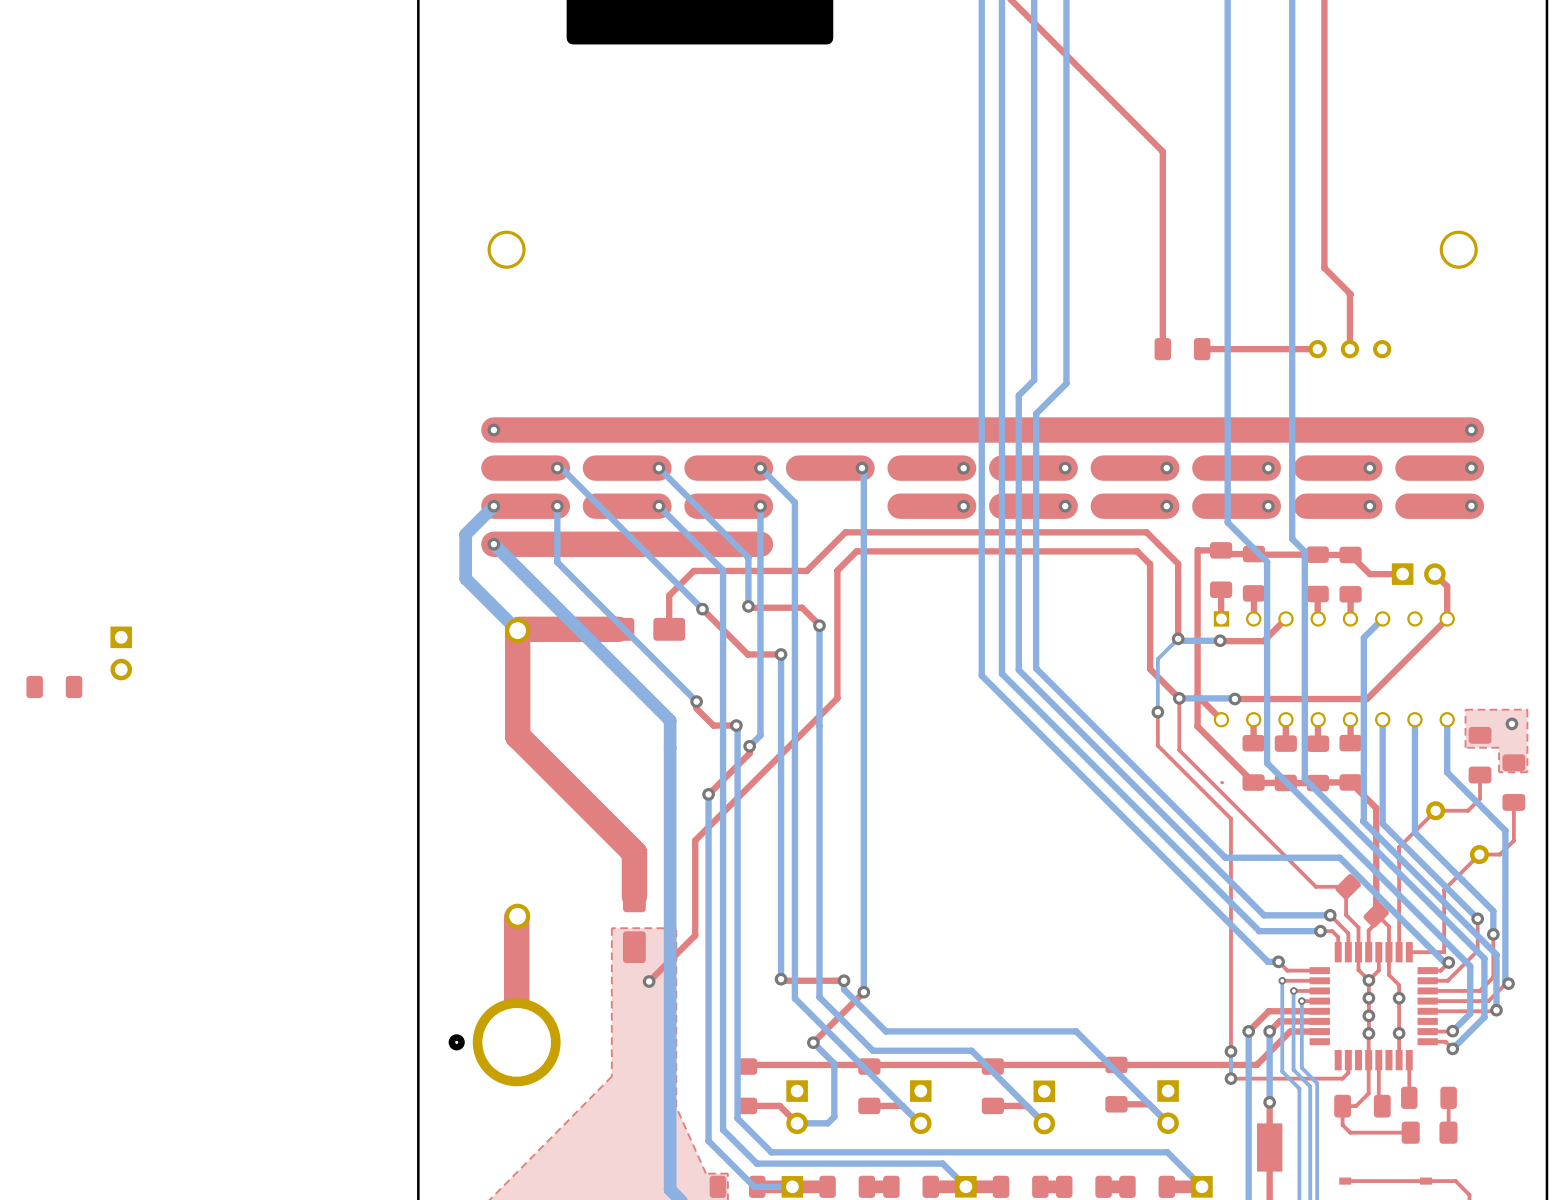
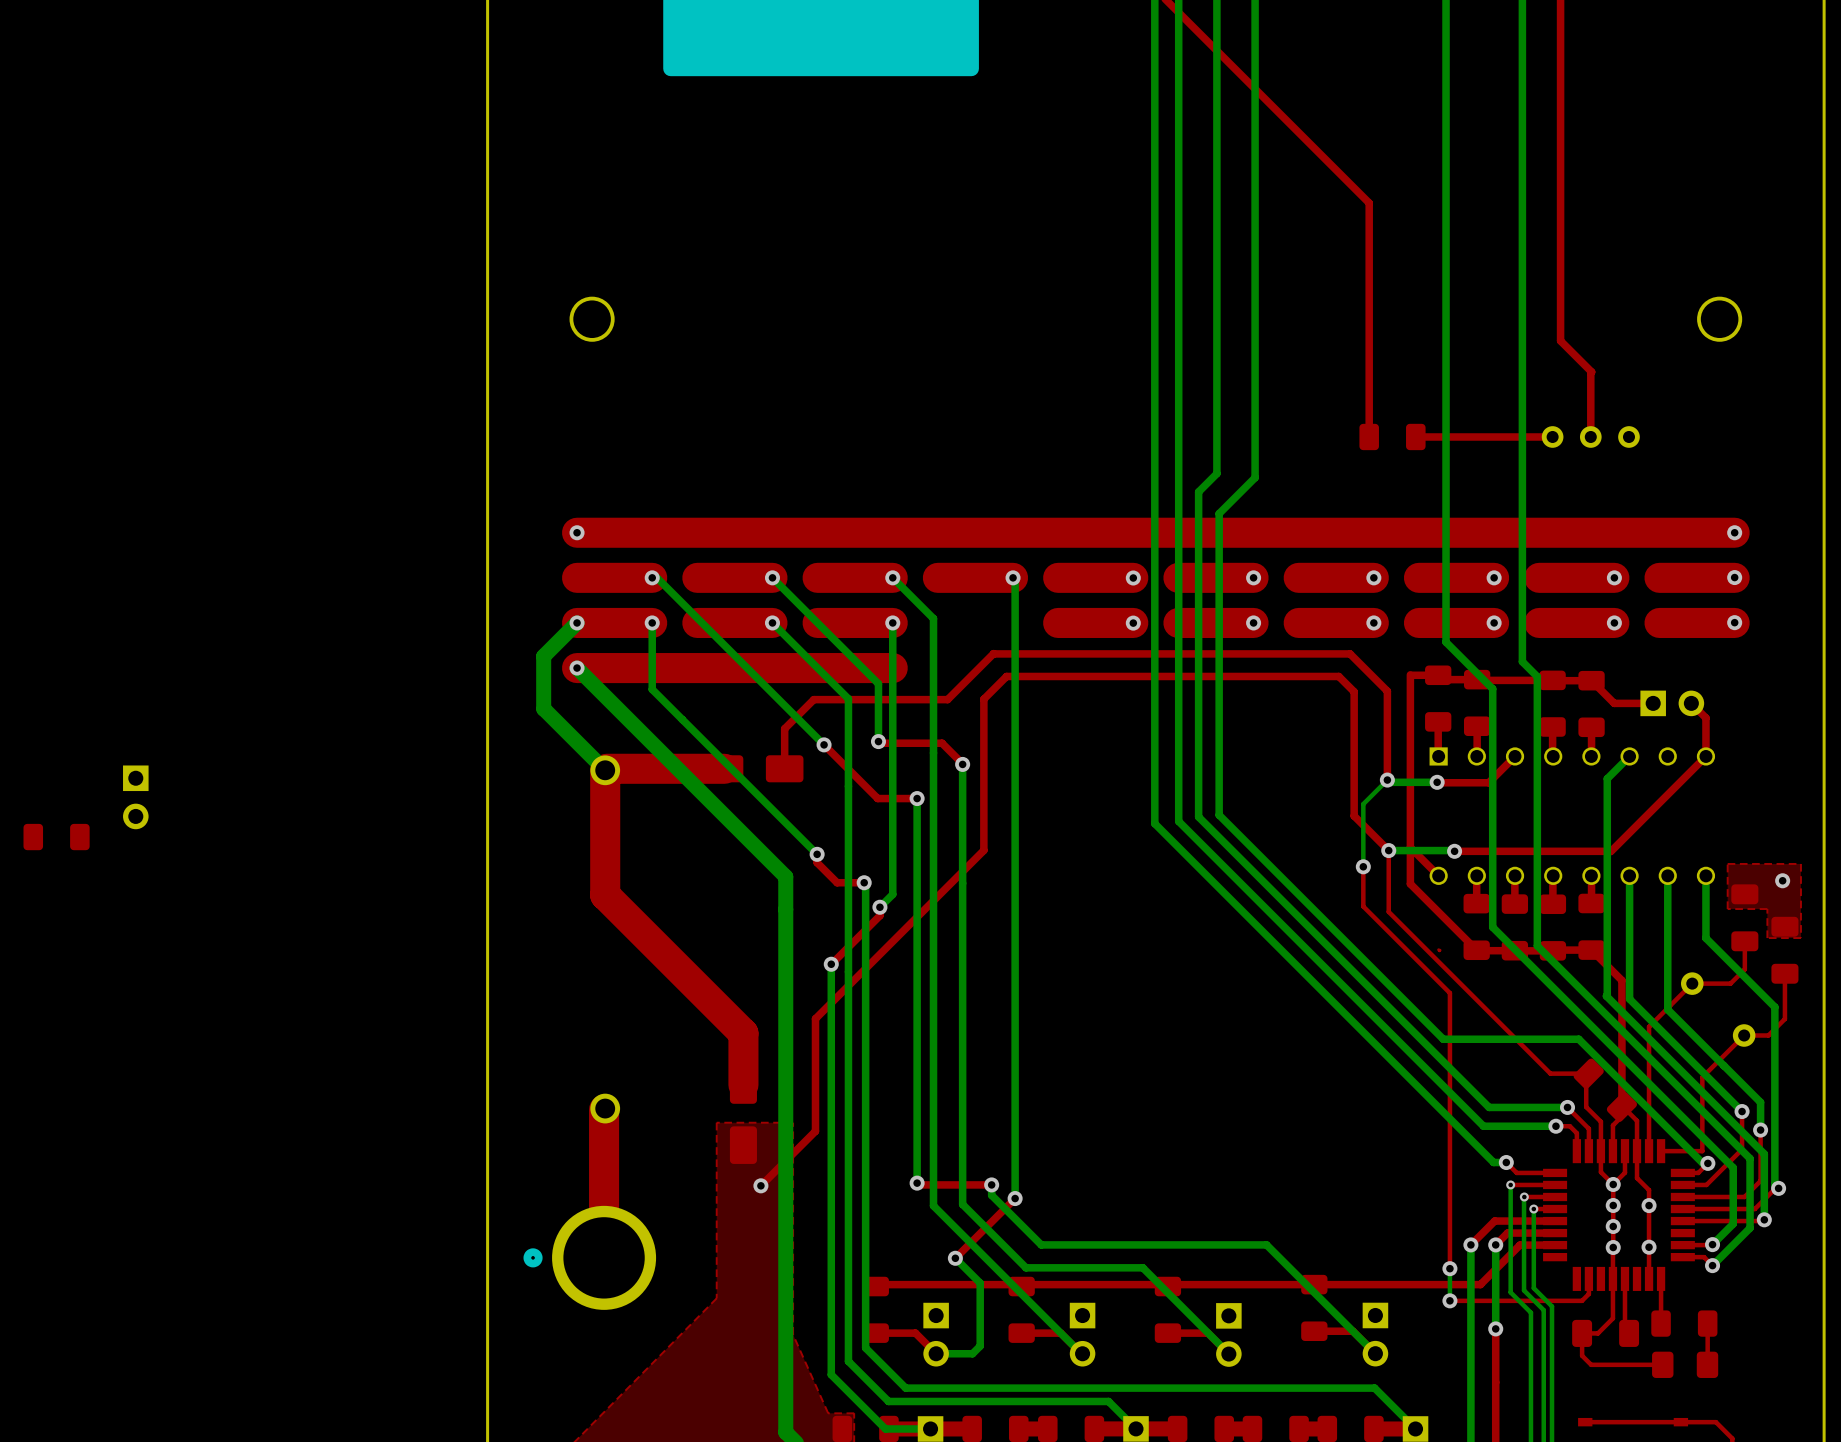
part: (1269, 1147) -> none

